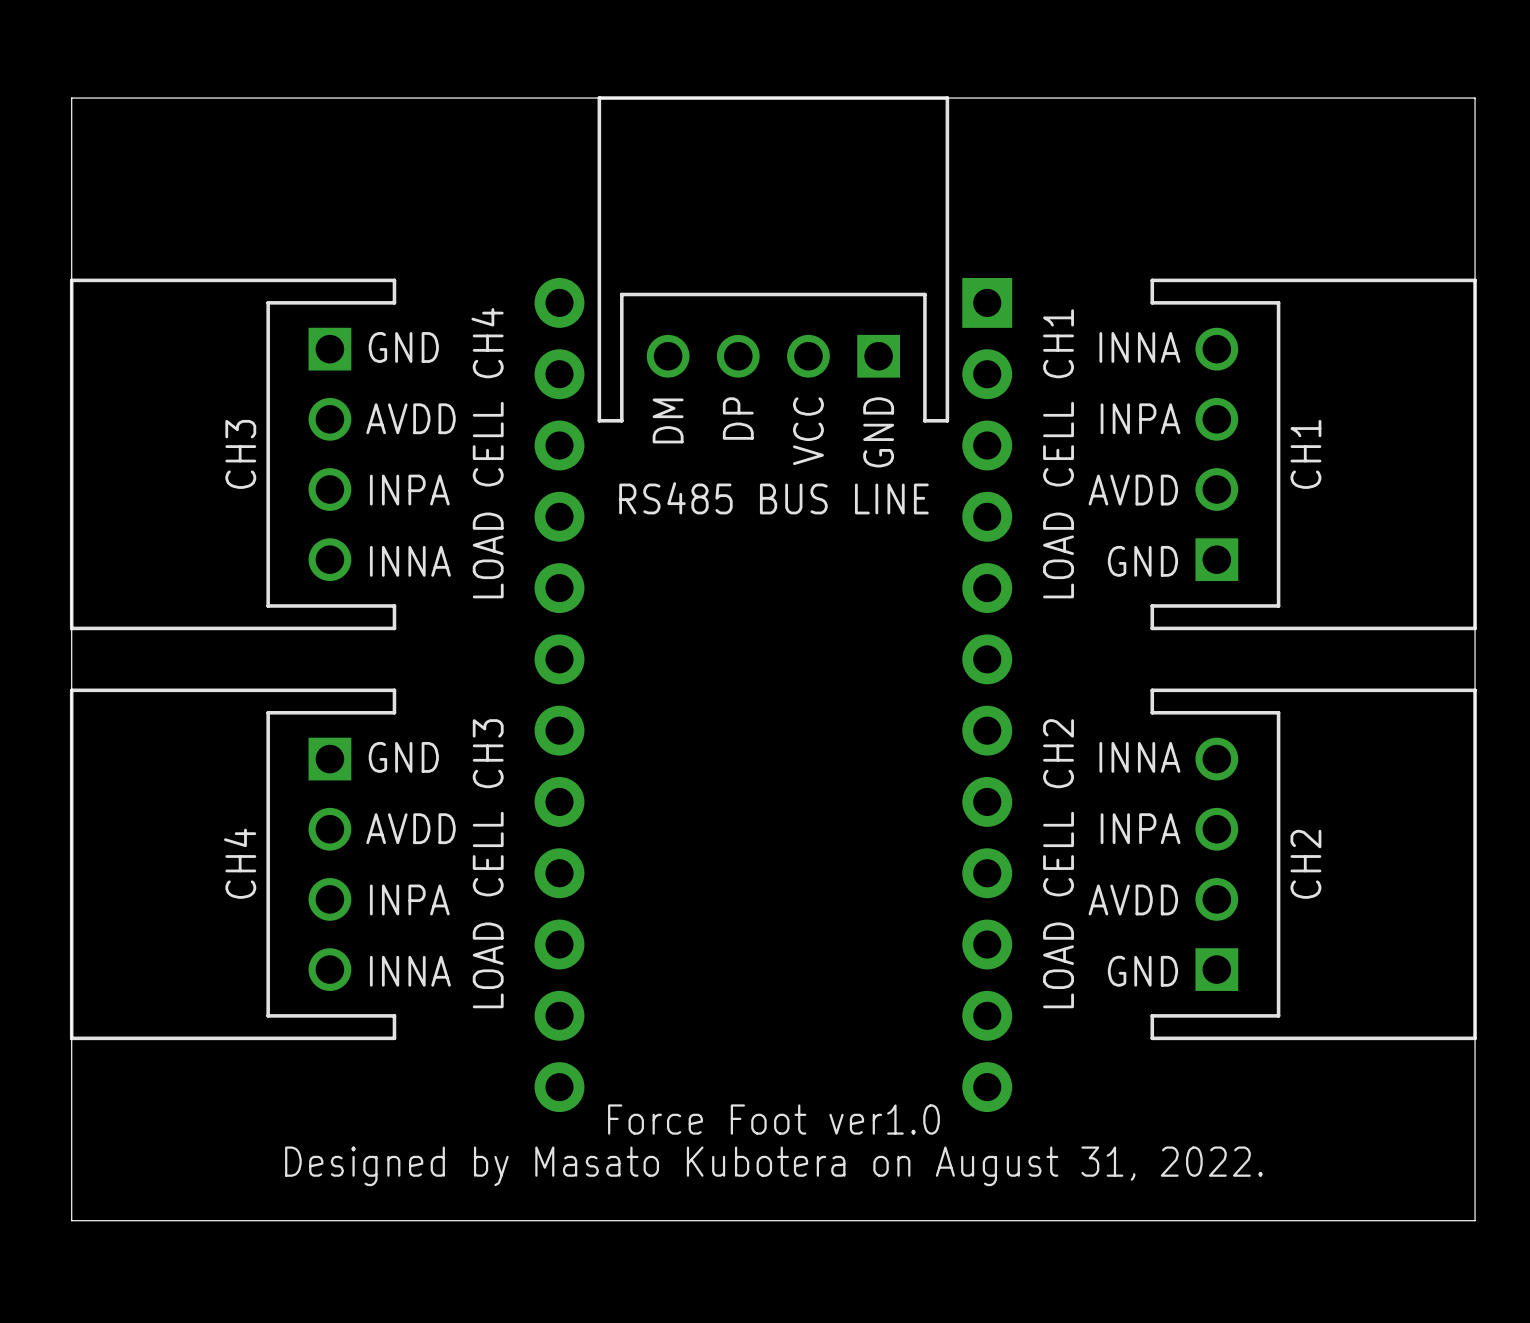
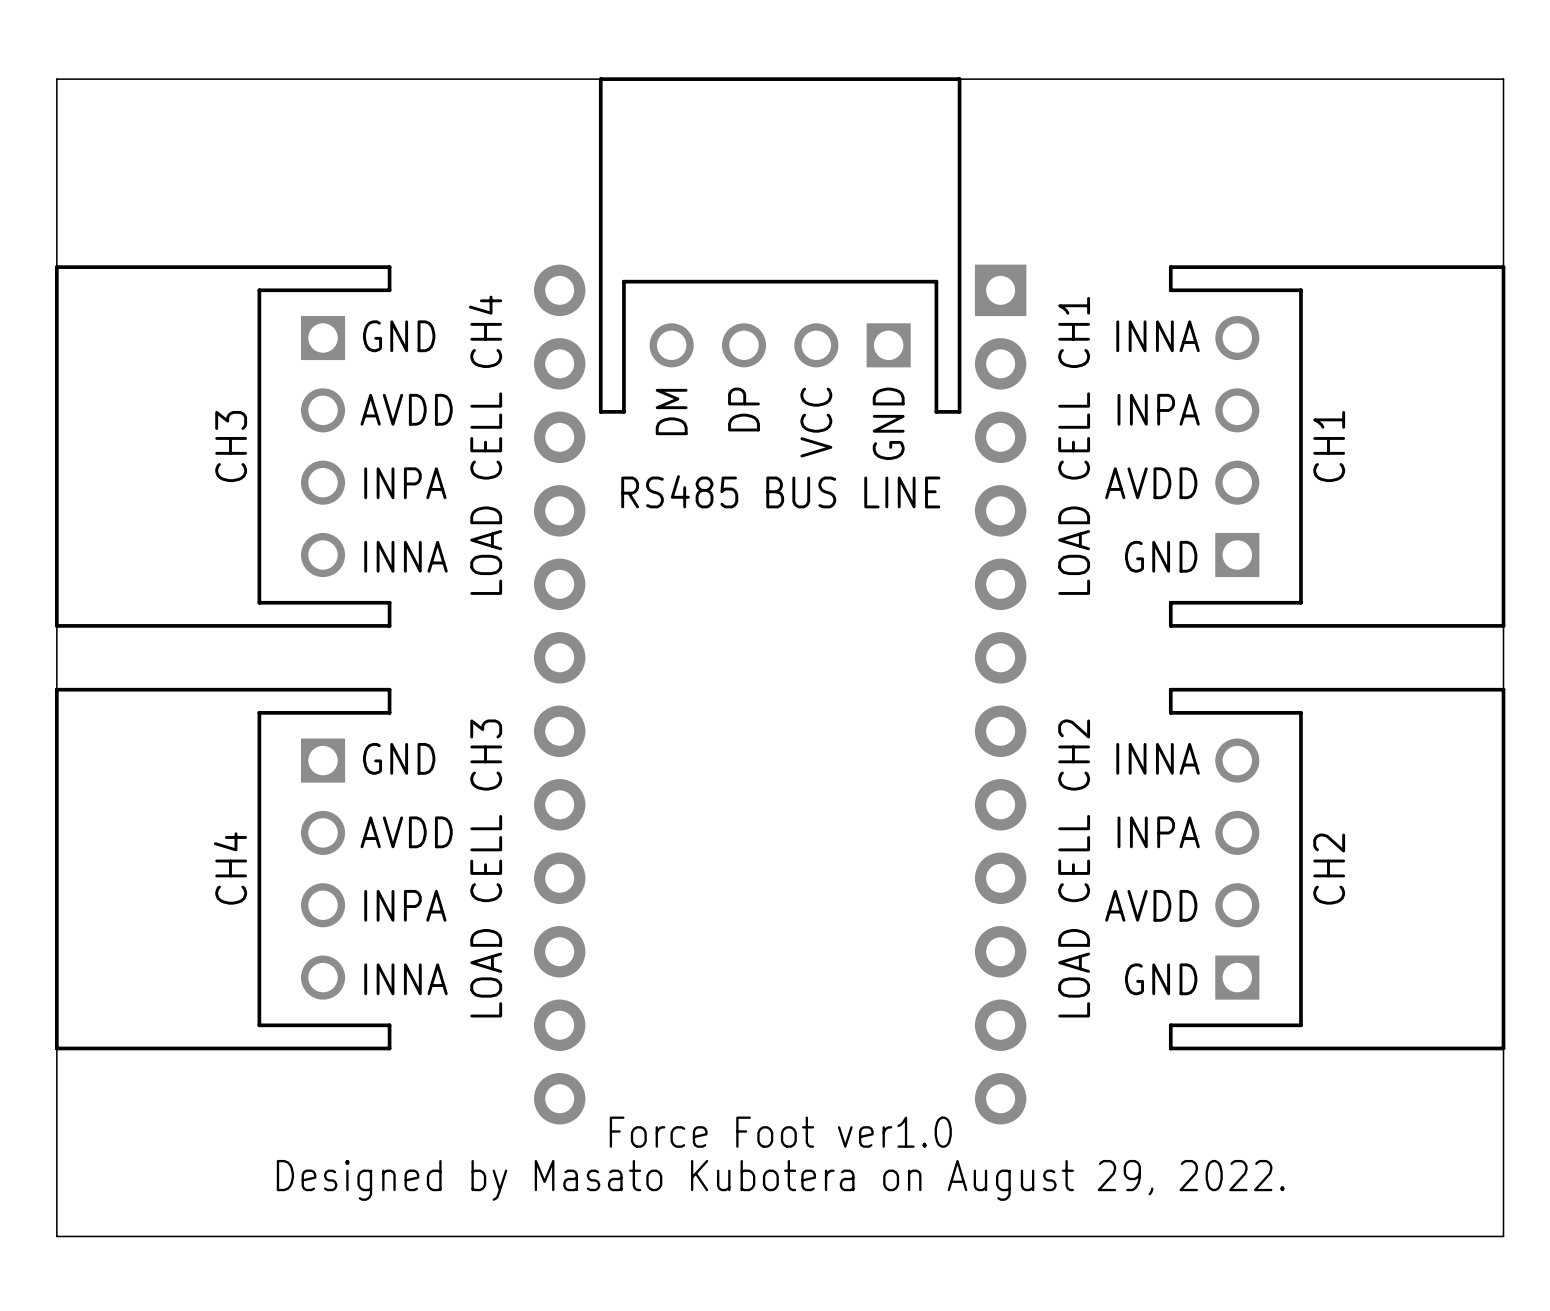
text: Designed by Masato Kubotera on August 31, 2022. (773, 1166) -> Designed by Masato Kubotera on August 29, 2022. (780, 1180)

